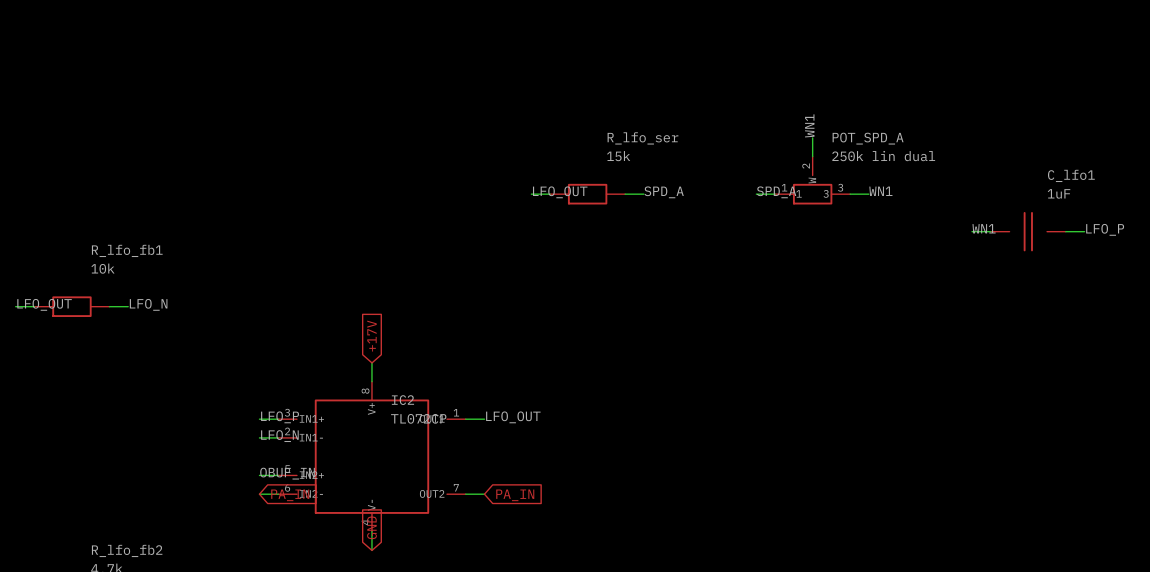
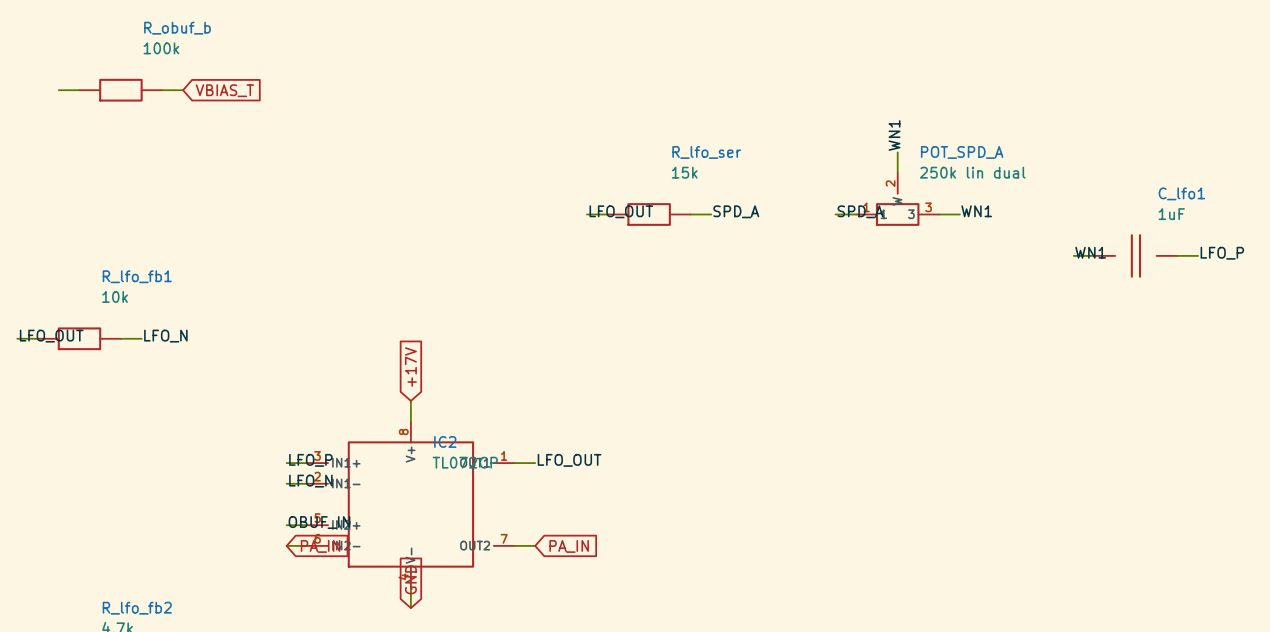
wire: none -> (58, 90) (79, 90)
R_obuf_b: none -> 100k (120, 90)
wire: none -> (162, 90) (183, 90)
global label: none -> VBIAS_T (224, 90)

